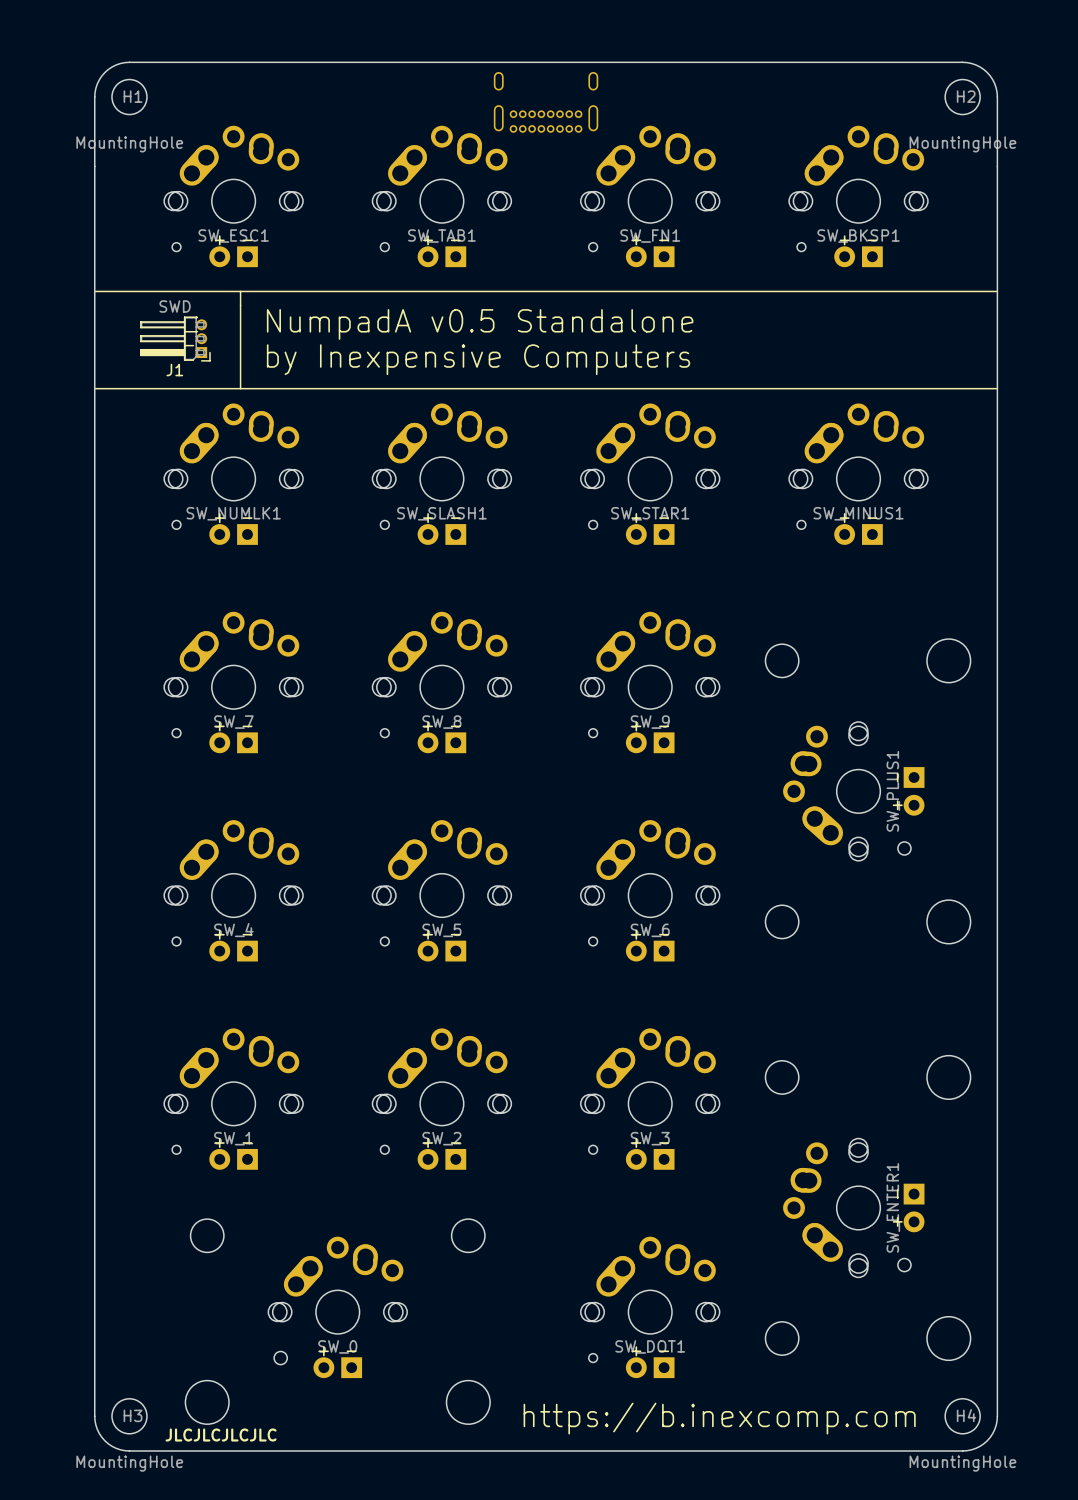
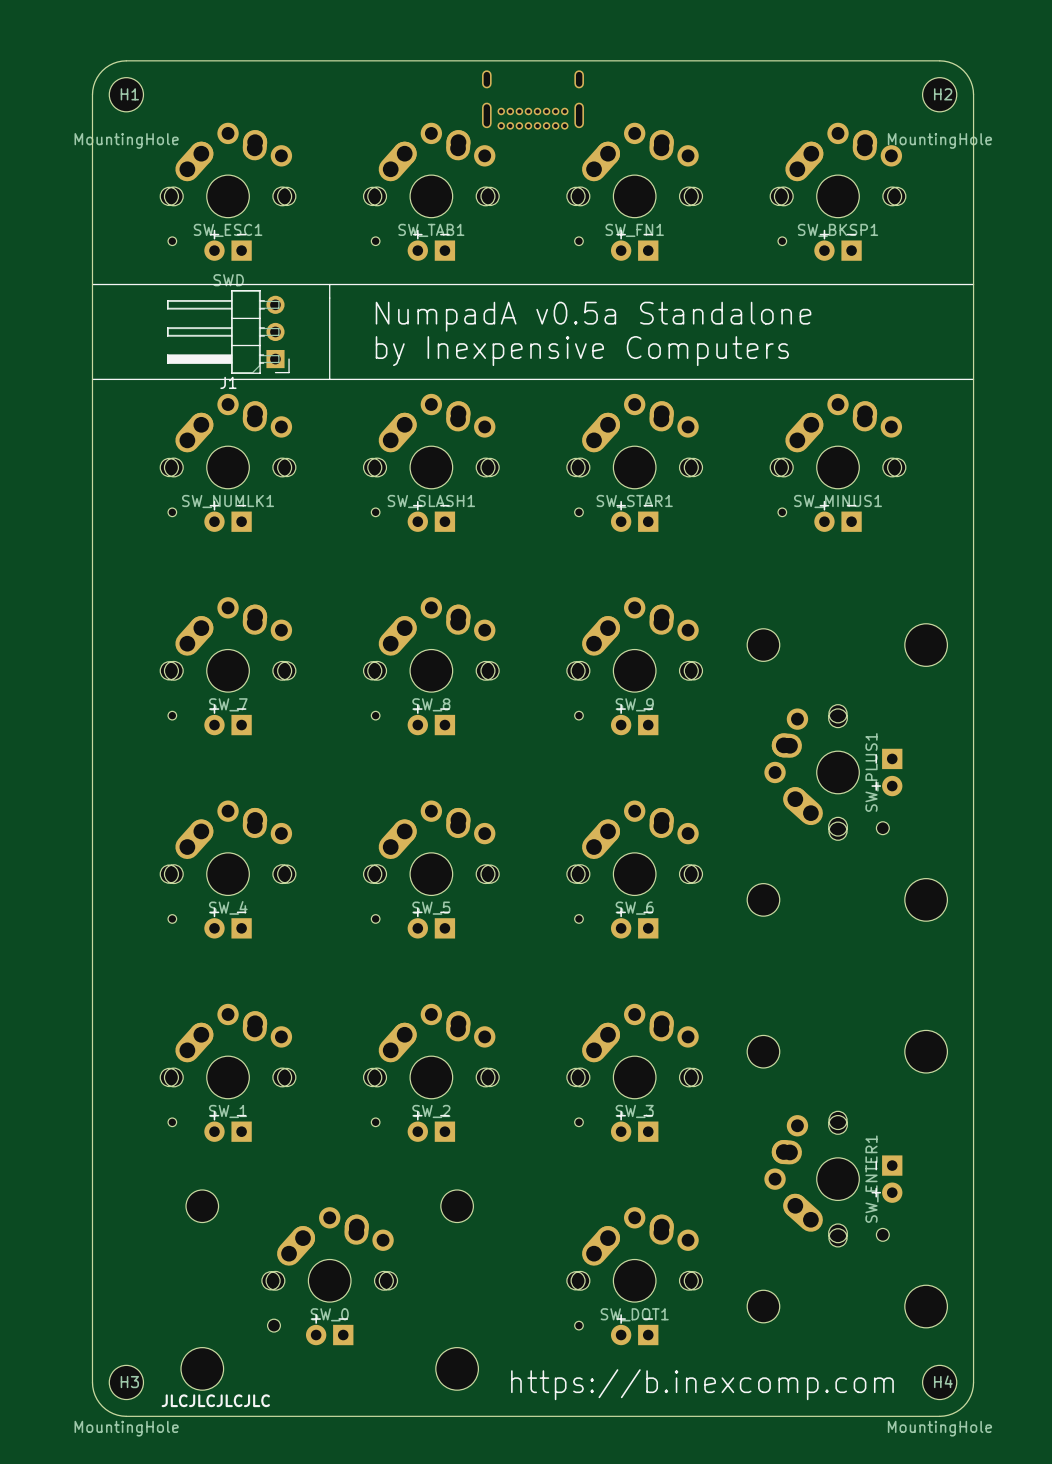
line: (240, 291) (240, 388) -> (329, 284) (329, 379)
J1 footprint: [140, 316, 211, 362] -> [167, 290, 290, 374]
text: NumpadA v0.5 Standalone (480, 324) -> NumpadA v0.5a Standalone (593, 316)
text position: by Inexpensive Computers (478, 359) -> by Inexpensive Computers (582, 351)

